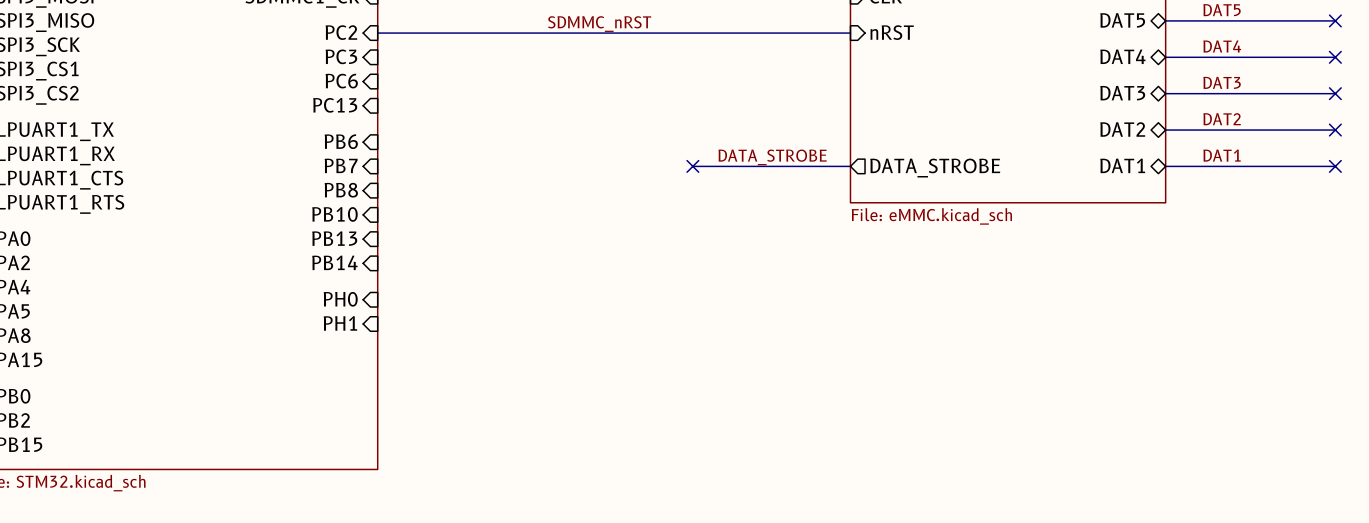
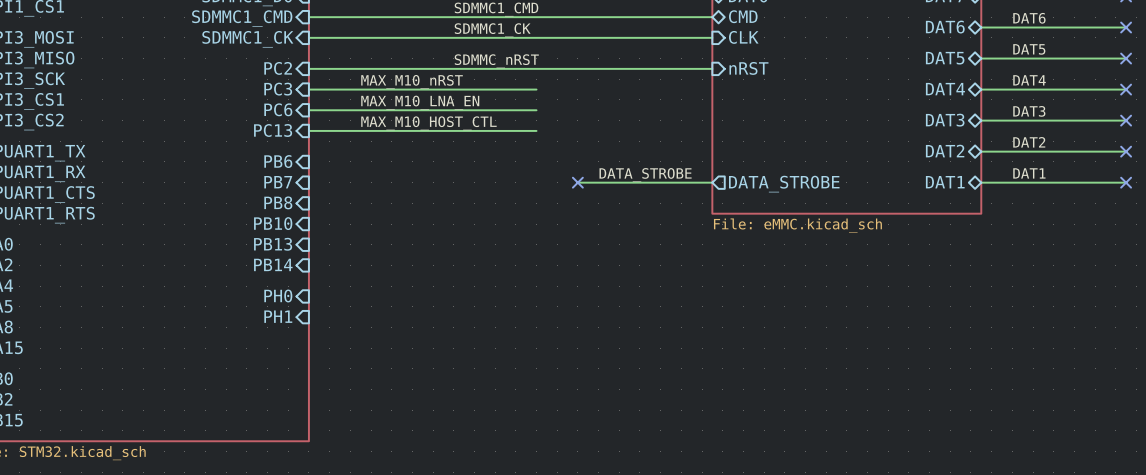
label: none -> MAX_M10_nRST (412, 81)
wire: none -> (308, 89) (536, 89)
label: none -> MAX_M10_LNA_EN (420, 102)
wire: none -> (308, 110) (536, 110)
label: none -> MAX_M10_HOST_CTL (428, 123)
wire: none -> (308, 130) (536, 130)

